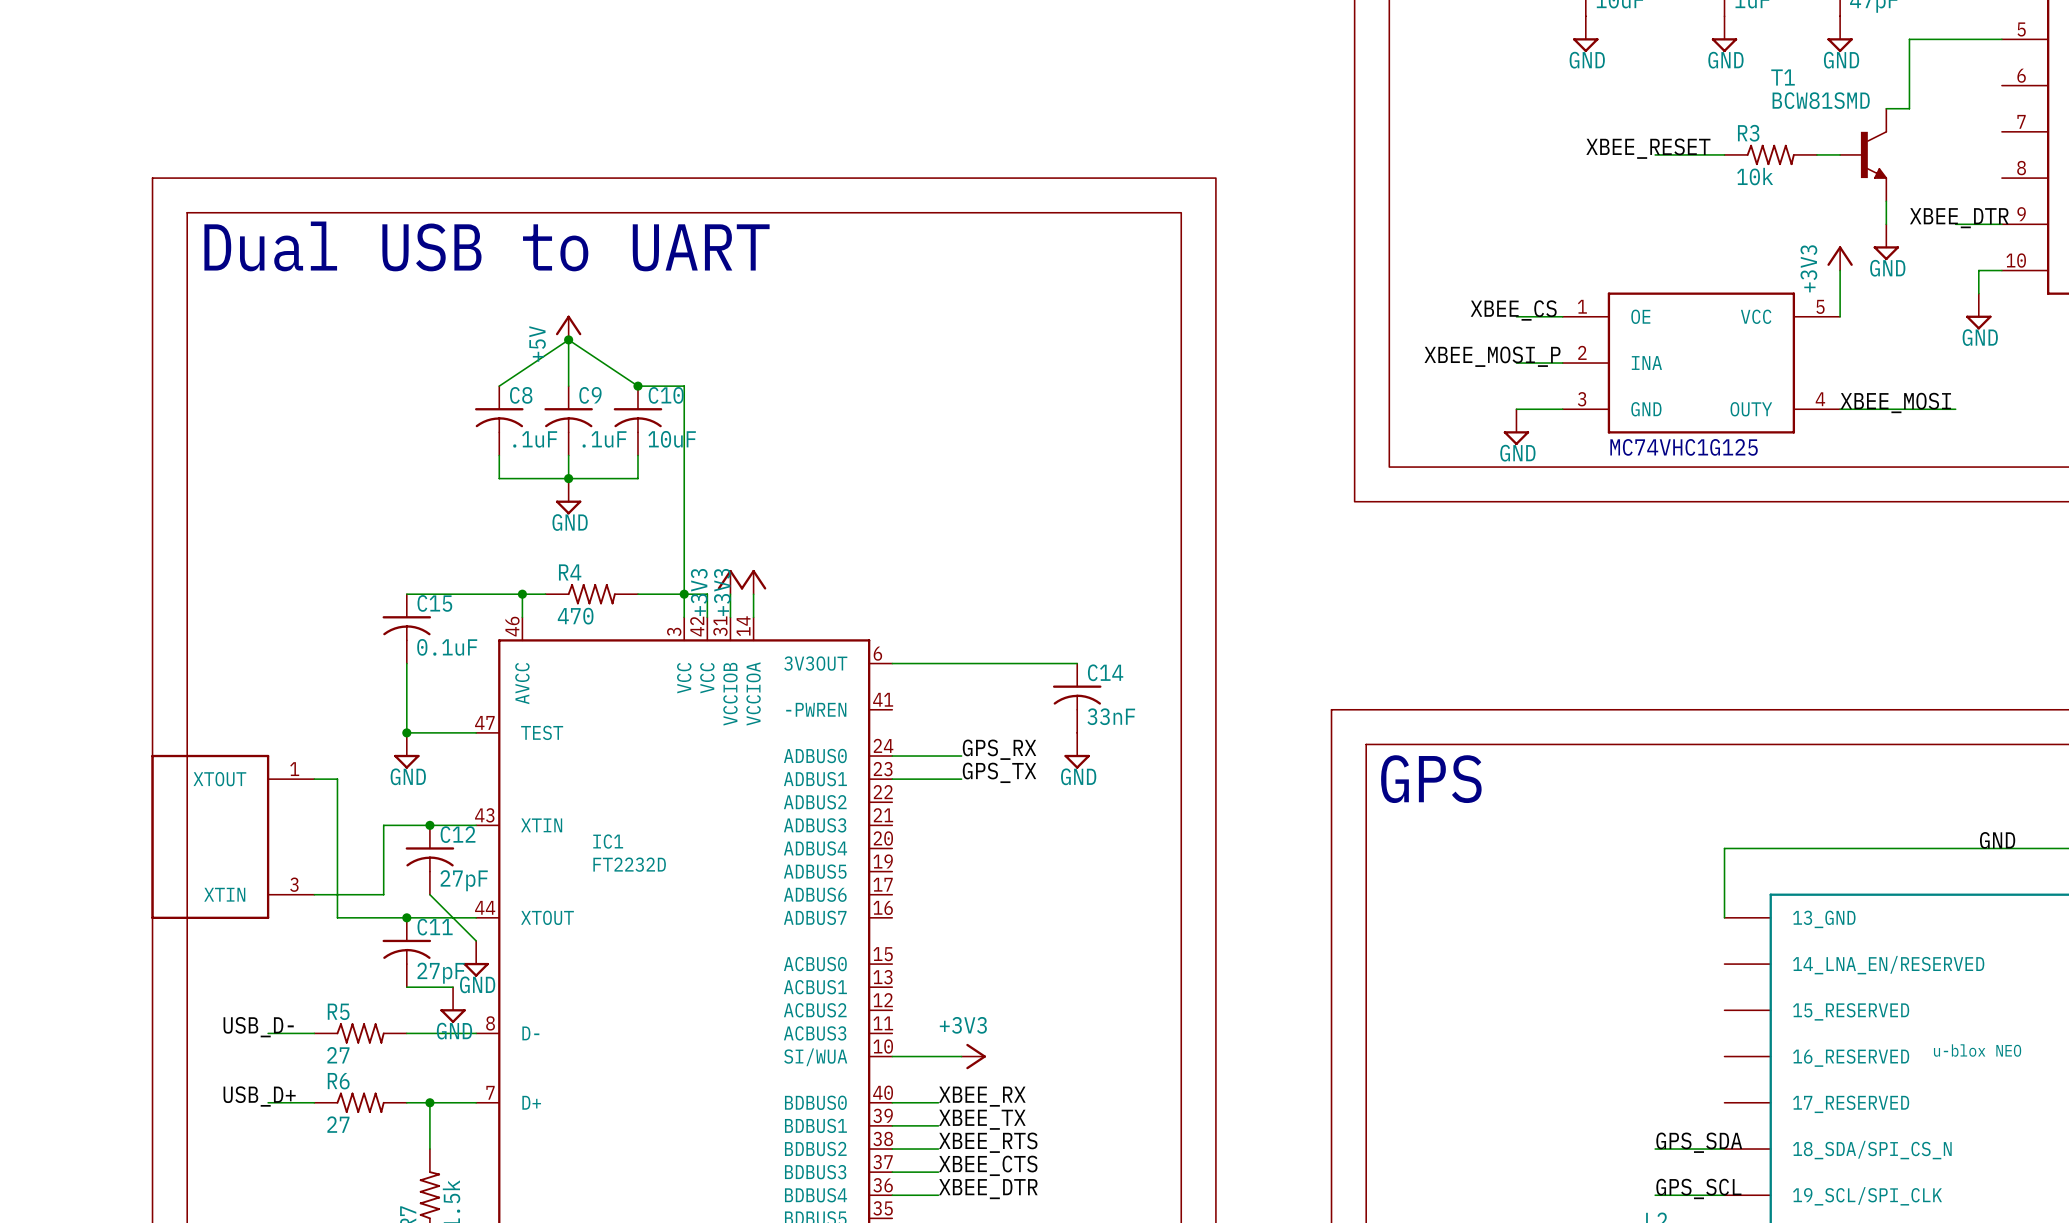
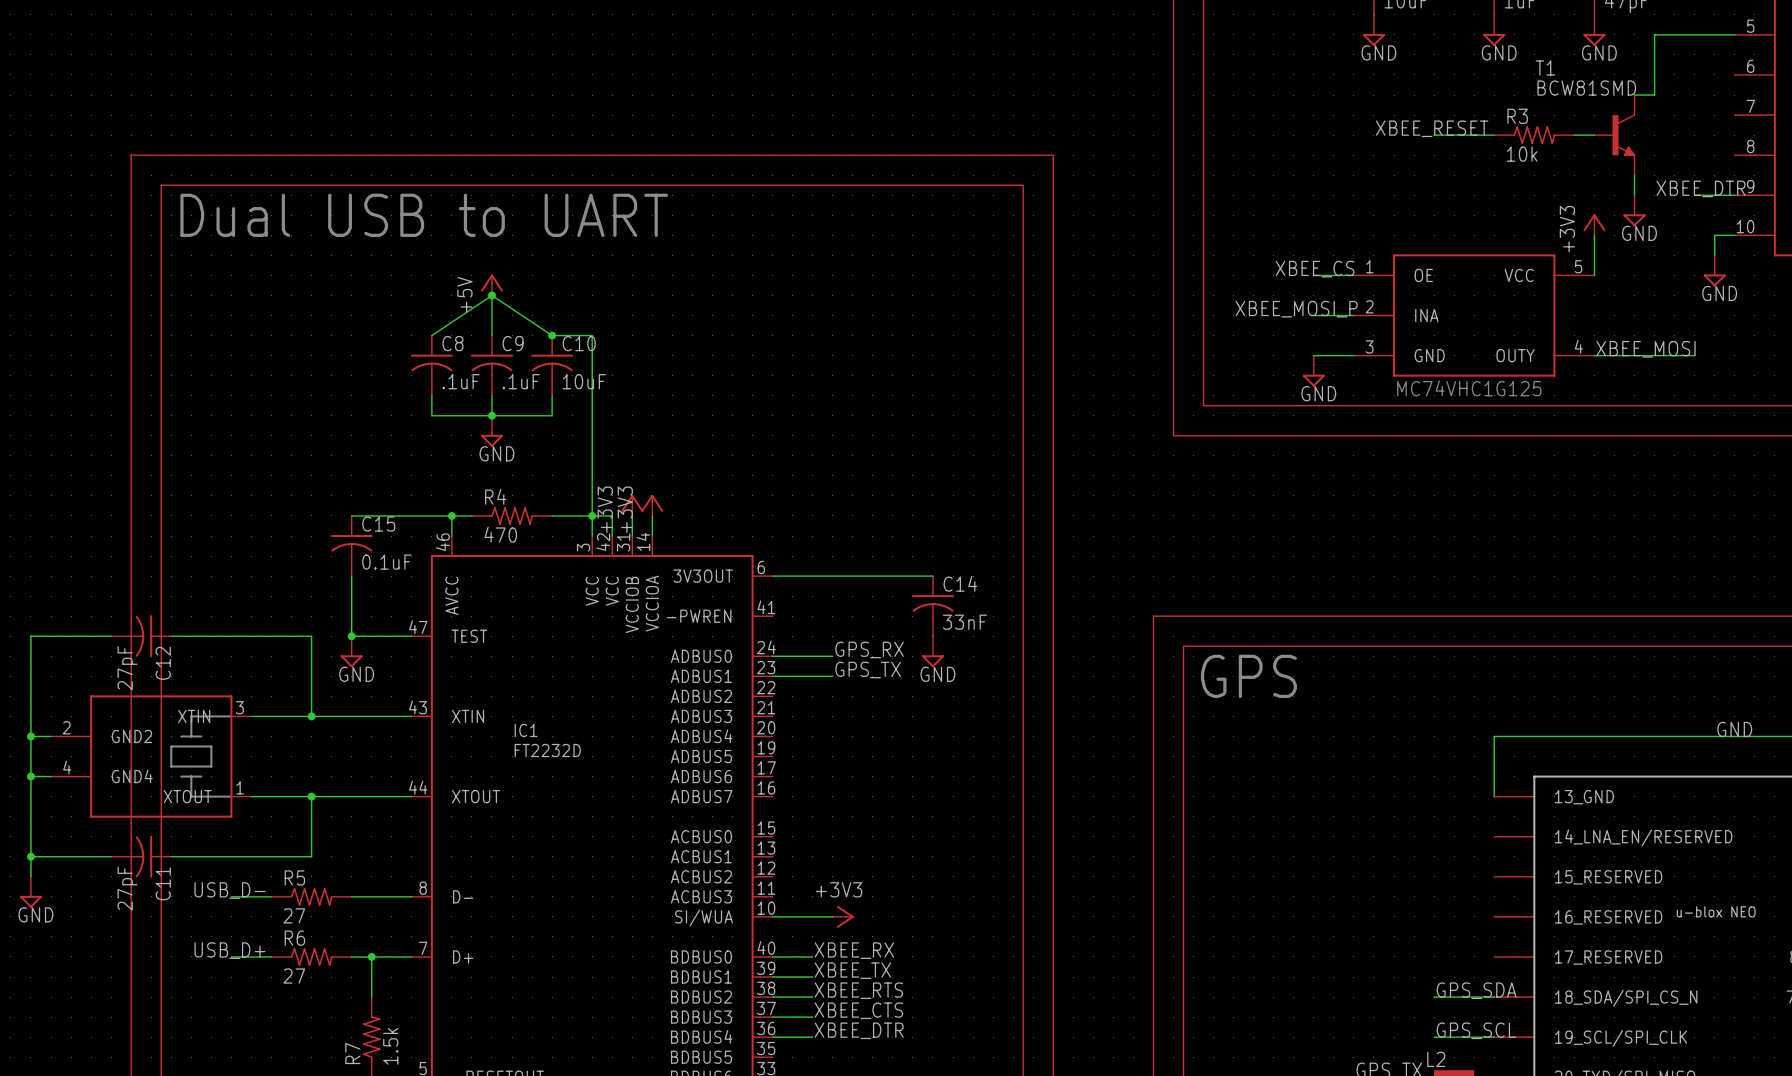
wire: none -> (111, 636) (30, 636) (30, 876)
wire: none -> (171, 636) (311, 636) (311, 716)
wire: (314, 779) (337, 779) (337, 917) -> (251, 796) (291, 796)
junction: none -> (311, 716)
wire: (383, 825) (383, 894) (314, 894) -> (331, 716) (251, 716)
junction: (429, 825) -> none
part: (232, 836) -> none
wire: none -> (30, 736) (51, 736)
junction: none -> (30, 736)
C12 rotation: 0° (429, 859) -> 90° clockwise (141, 636)
C12 position: (429, 860) -> (141, 636)
part: none -> (151, 756)
wire: none -> (30, 776) (51, 776)
junction: none -> (30, 776)
wire: (429, 894) (476, 940) -> none
wire: none -> (311, 796) (311, 856) (171, 856)
junction position: (406, 917) -> (311, 796)
C11 rotation: 0° (406, 952) -> 90° clockwise (141, 856)
C11 position: (406, 952) -> (141, 856)
power symbol: GND (476, 958) -> none
wire: none -> (30, 856) (111, 856)
junction: none -> (30, 856)
wire: (406, 987) (453, 987) -> none
power symbol: GND (453, 1005) -> none
power symbol: none -> GND (30, 892)

